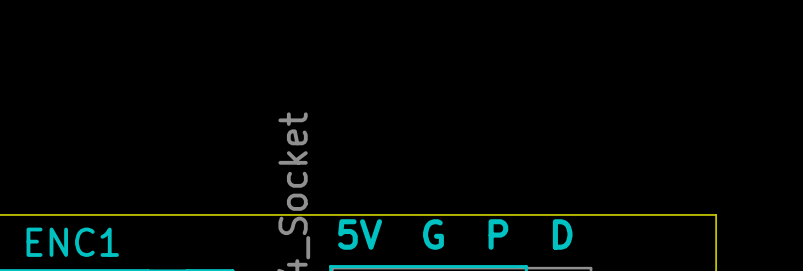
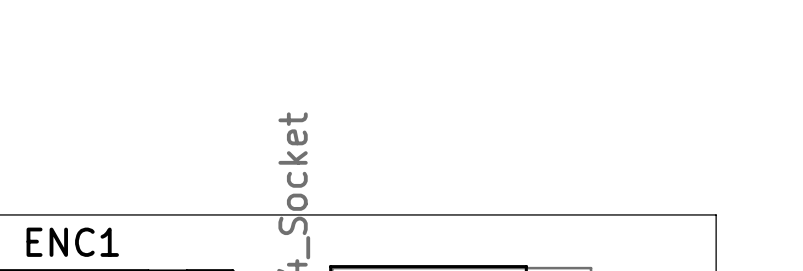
text: 5V G P D (455, 234) -> none

